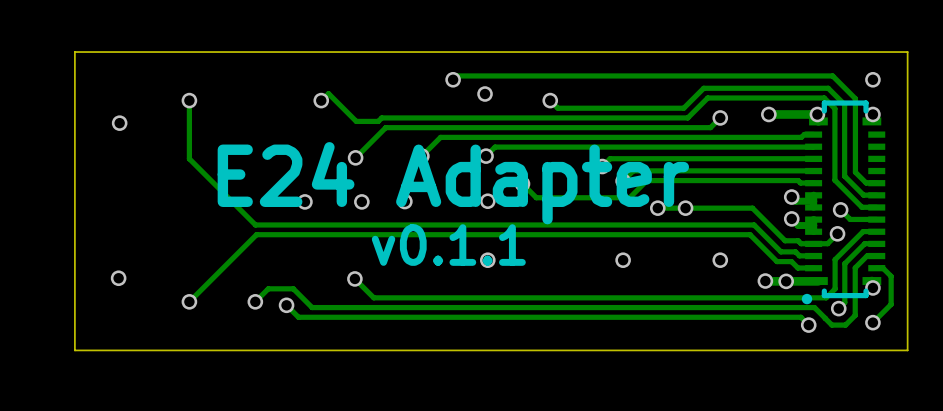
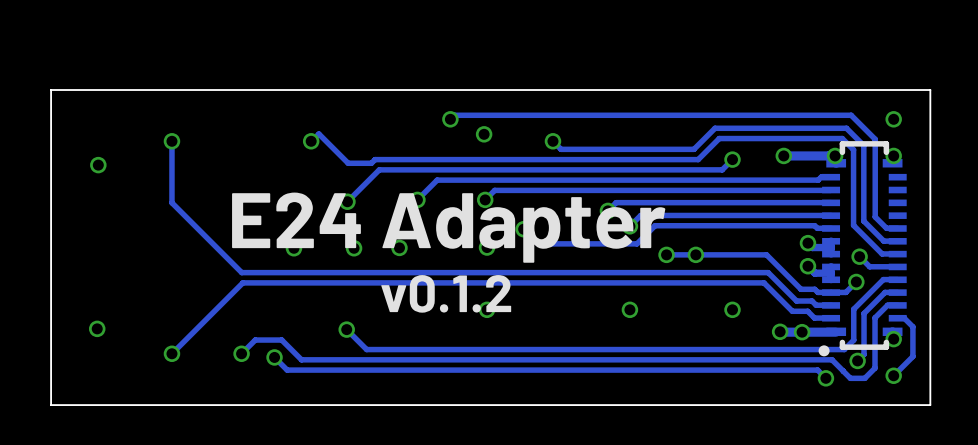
text: v0.1.1 (448, 245) -> v0.1.2 (446, 293)

